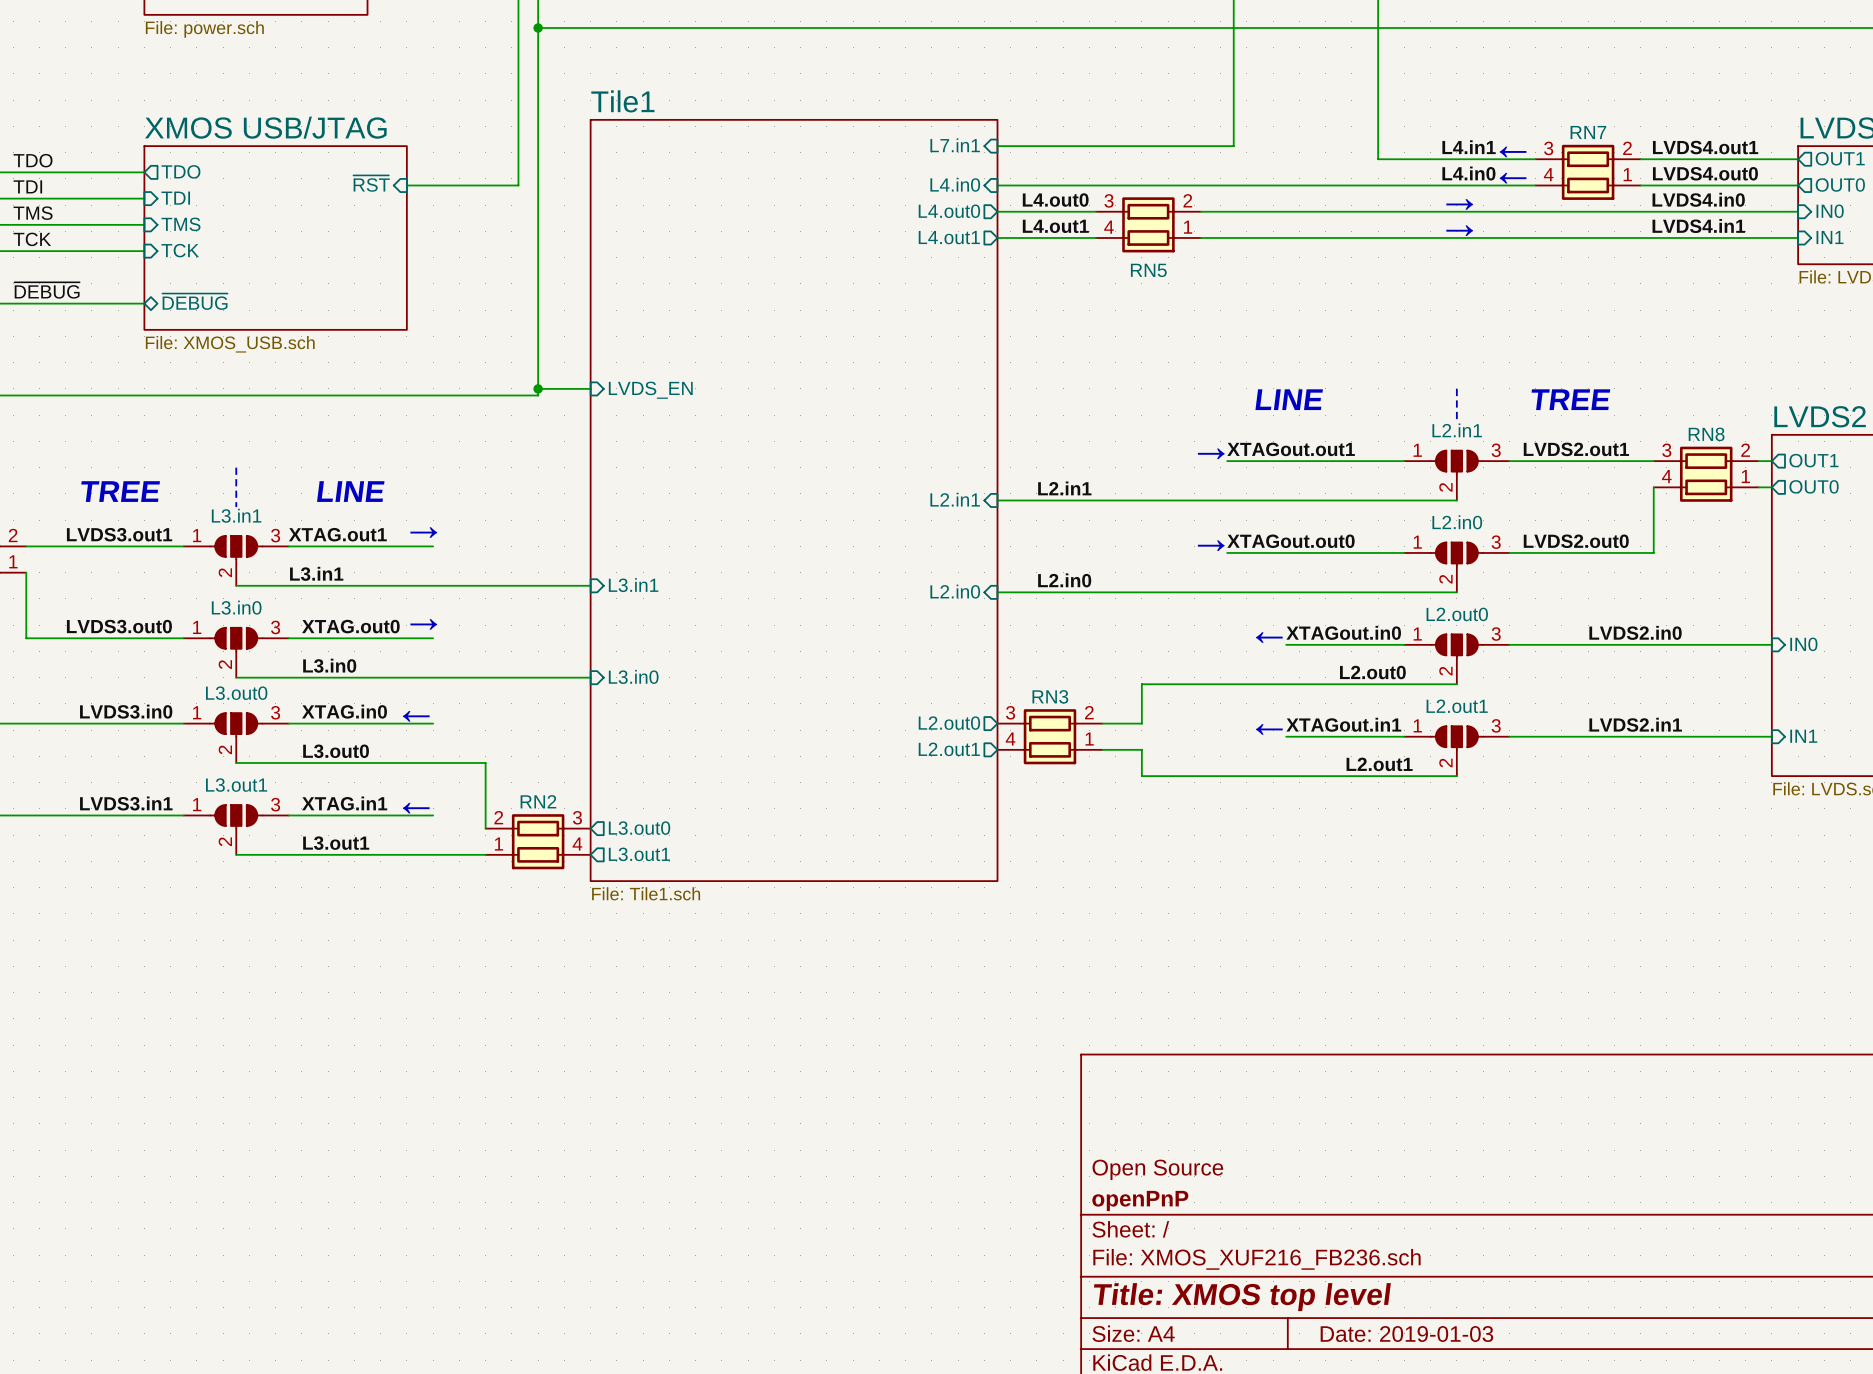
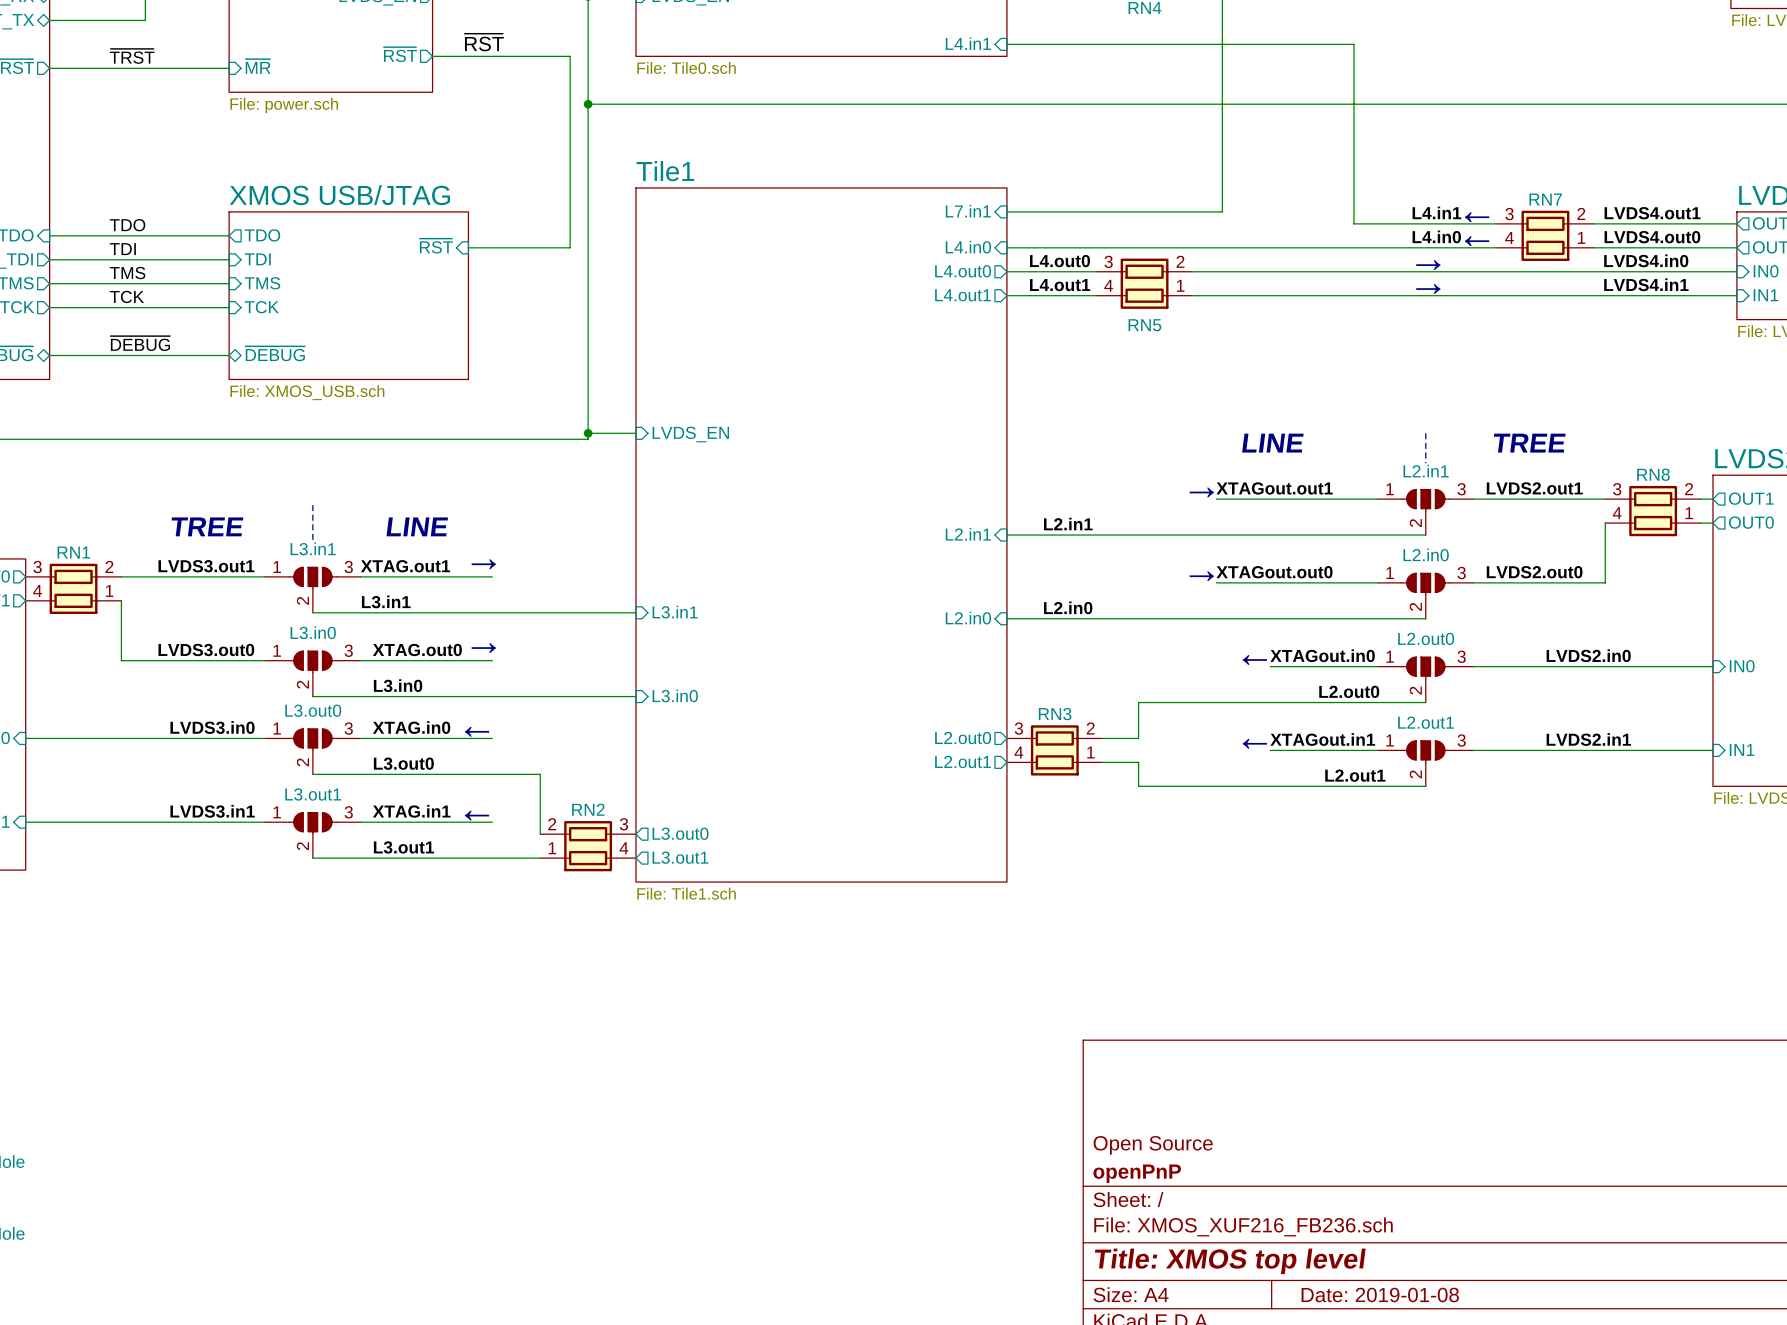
title block: Date: 2019-01-03 (1406, 1334) -> Date: 2019-01-08 (1380, 1295)

